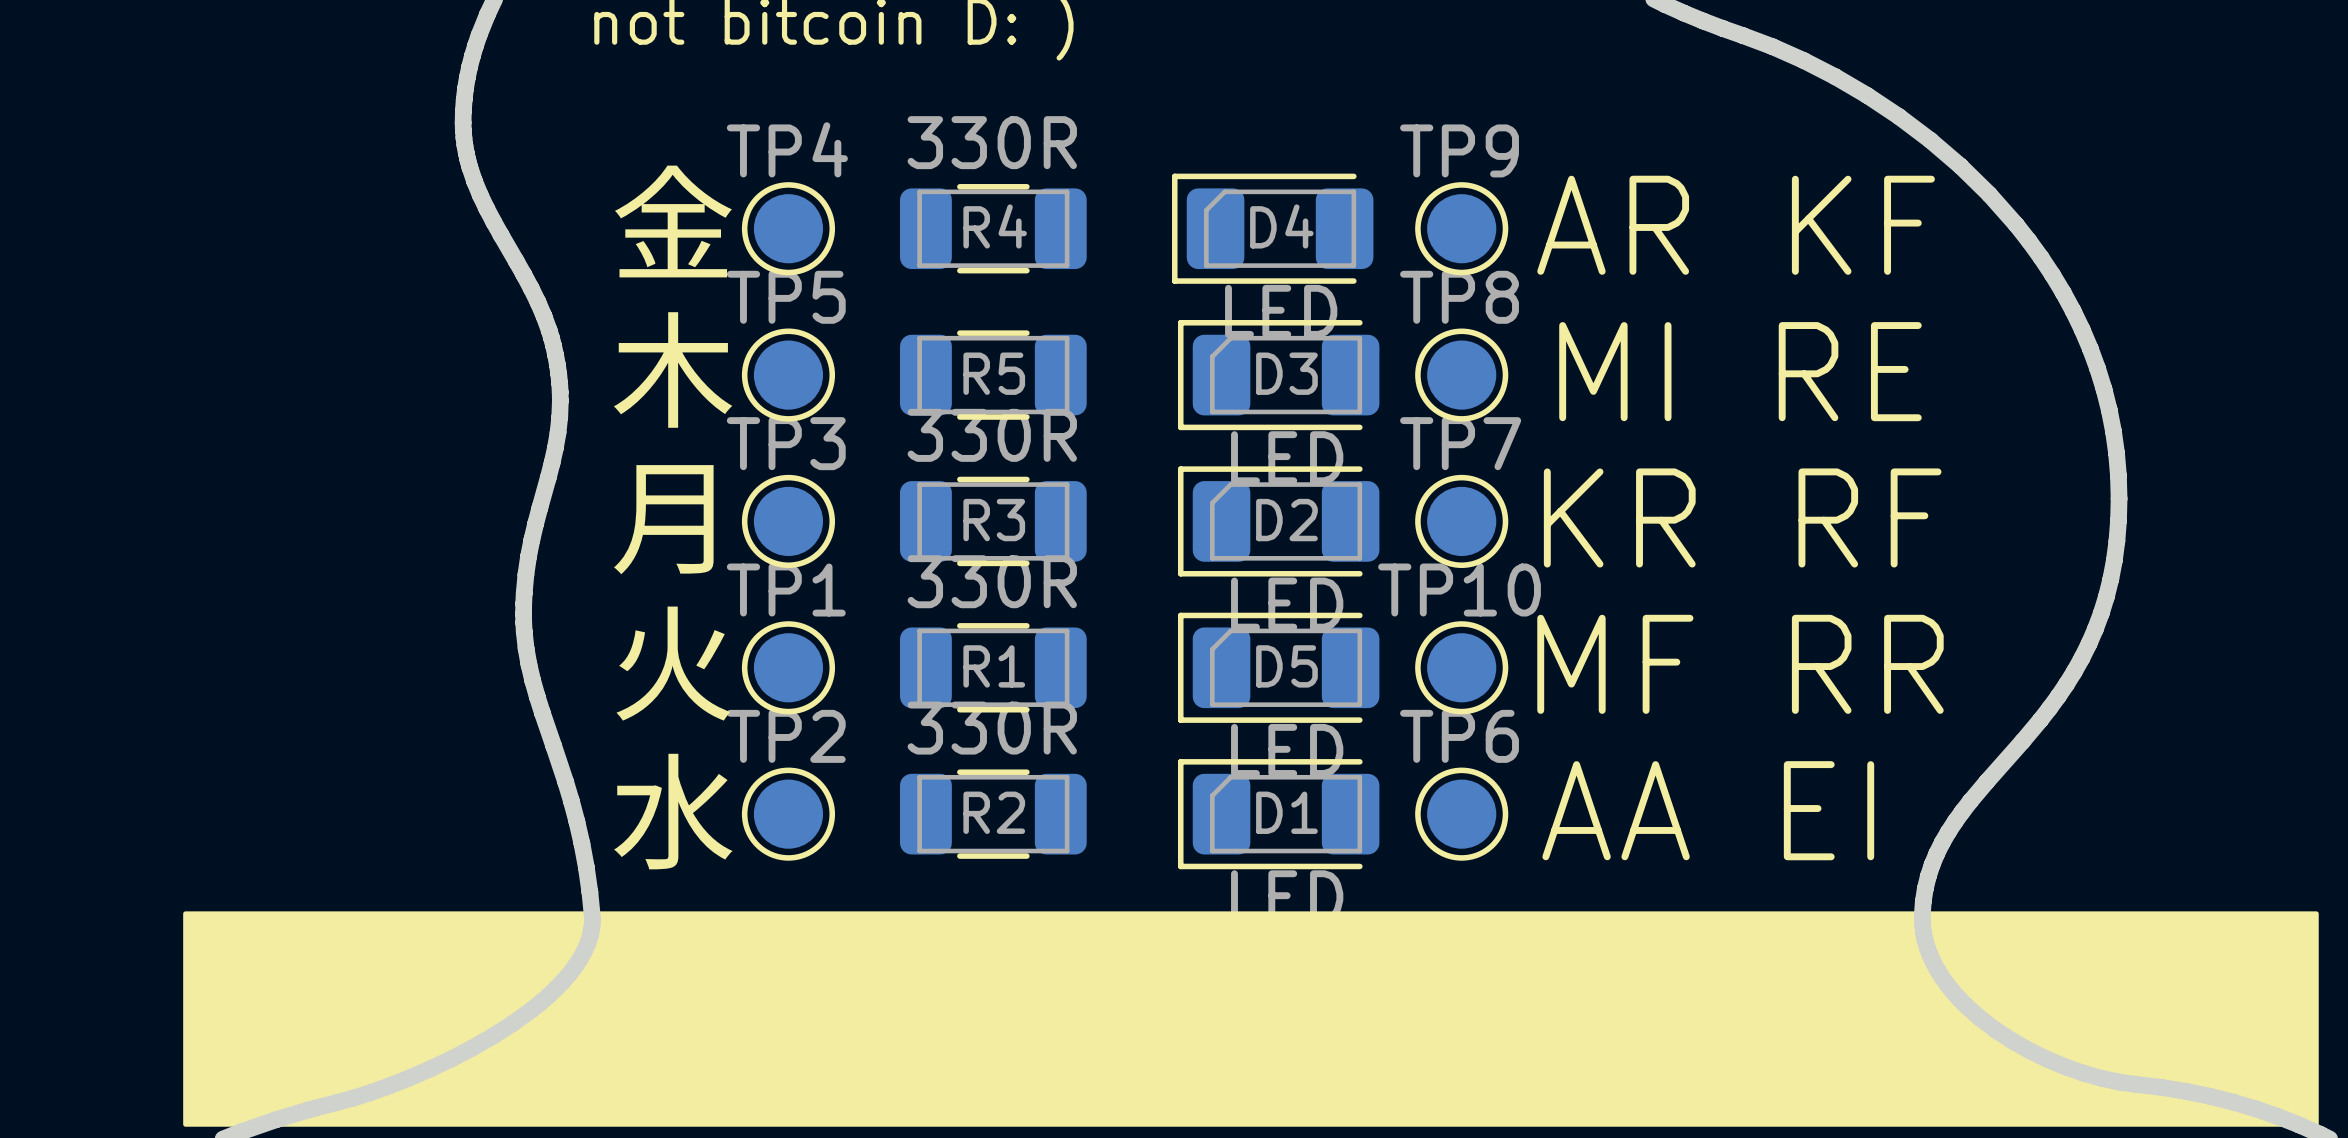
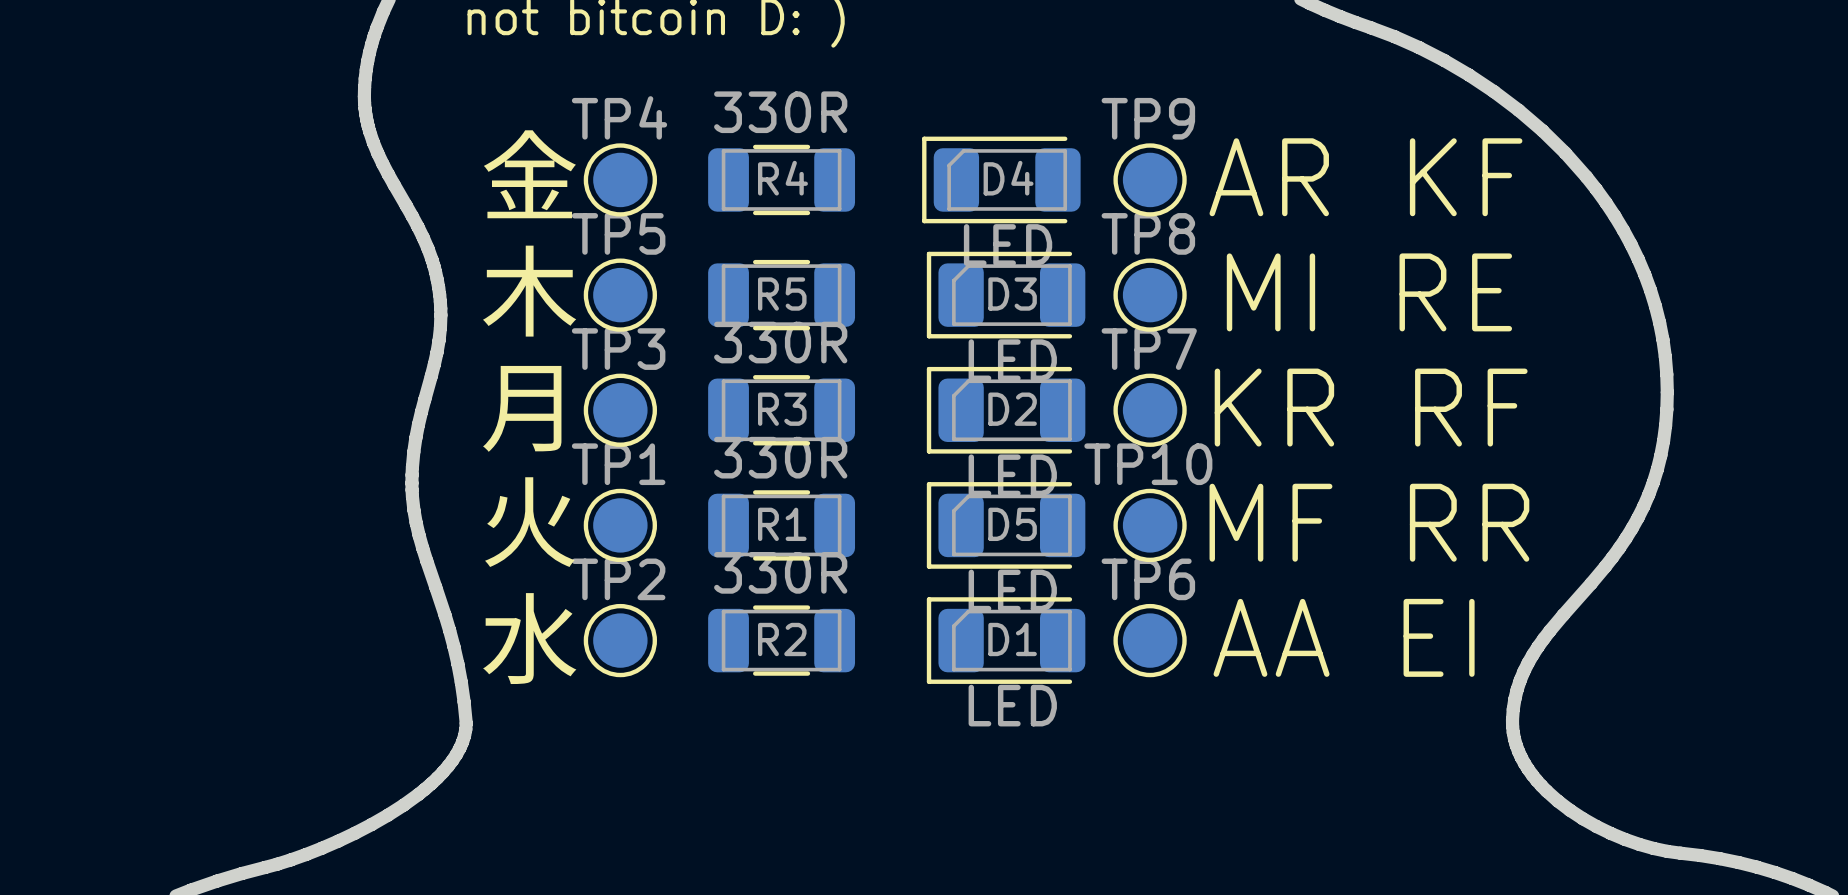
drawing: [183, 911, 2319, 1127] -> none

